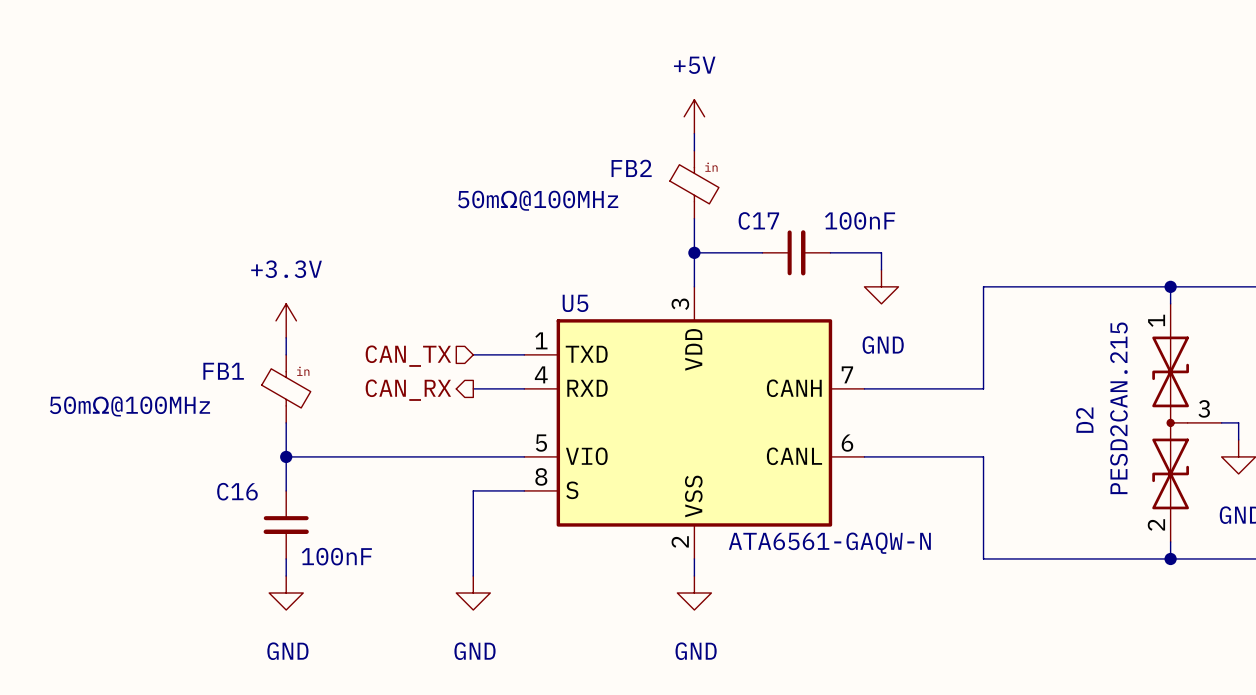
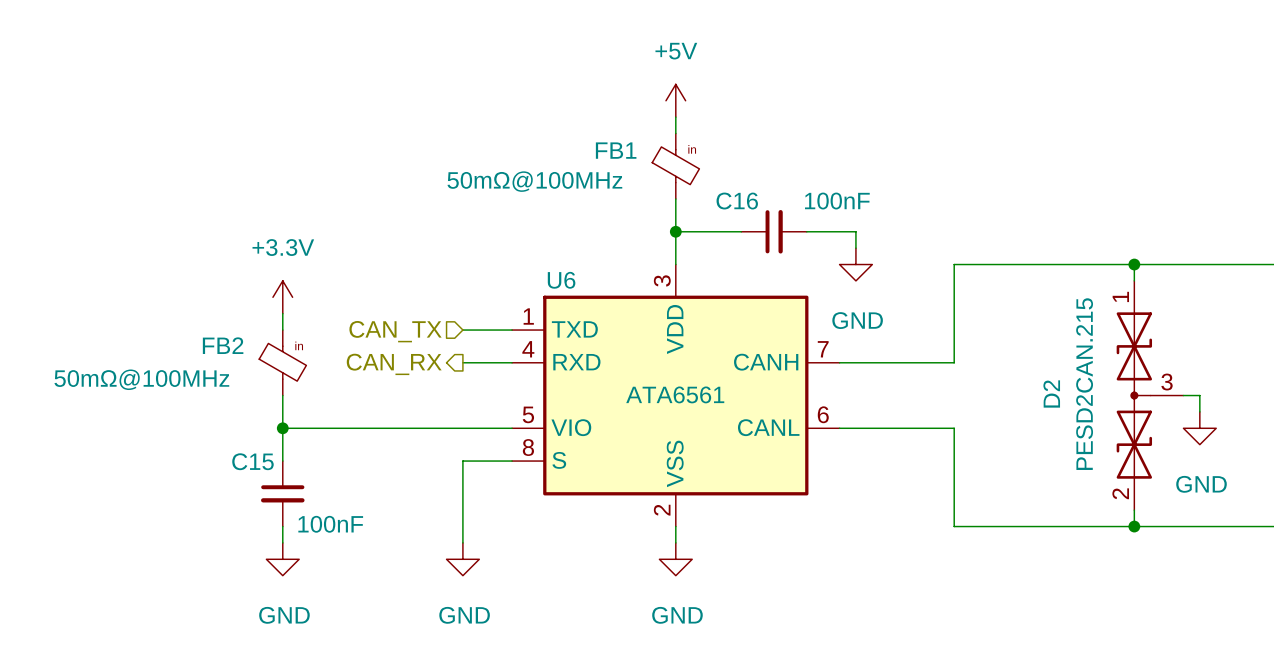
FB2 name: FB2 (631, 168) -> FB1 (616, 150)
C17 name: C17 (758, 220) -> C16 (737, 201)
U5 name: U5 (575, 303) -> U6 (561, 280)
FB1 name: FB1 (223, 371) -> FB2 (223, 345)
C16 name: C16 (237, 491) -> C15 (252, 461)
U5 value: ATA6561-GAQW-N (829, 543) -> ATA6561 (675, 394)

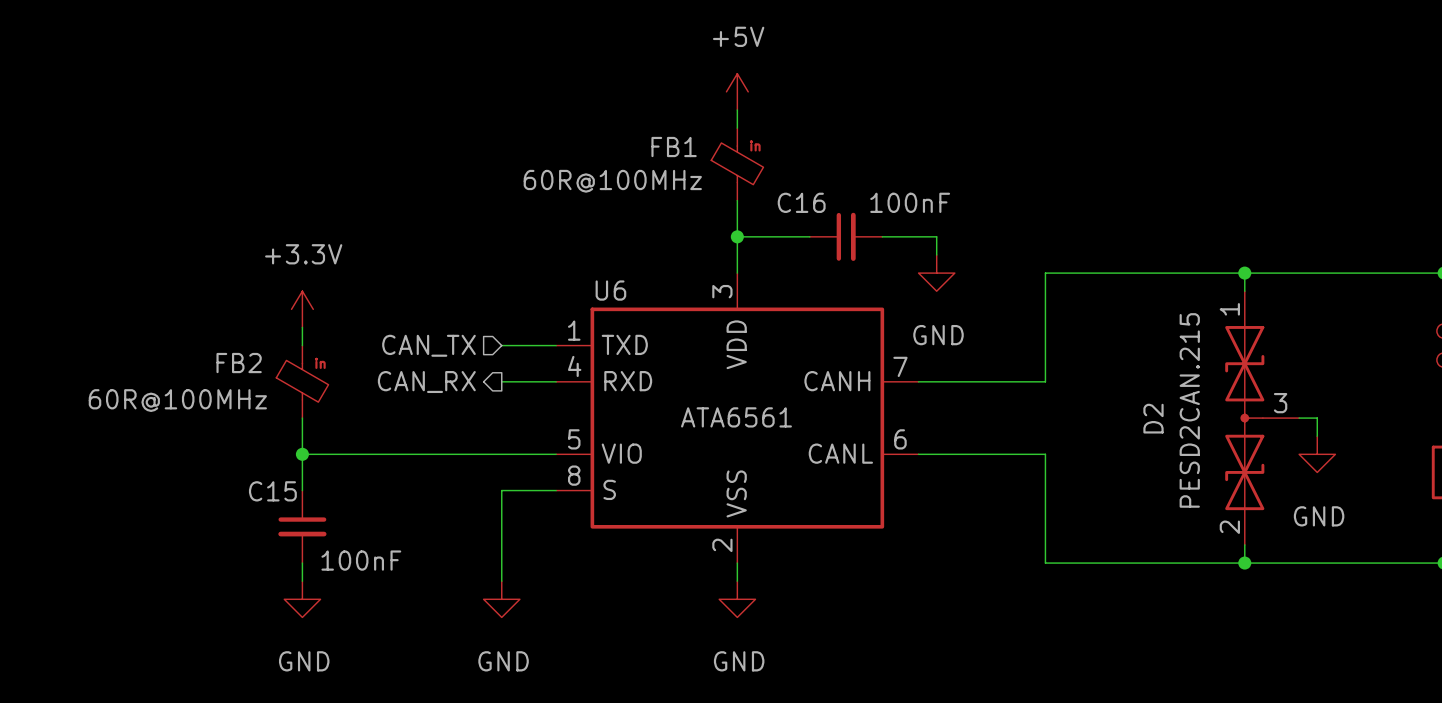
FB1 value: 50mΩ@100MHz (534, 181) -> 60R@100MHz (612, 181)
FB2 value: 50mΩ@100MHz (141, 379) -> 60R@100MHz (177, 400)

